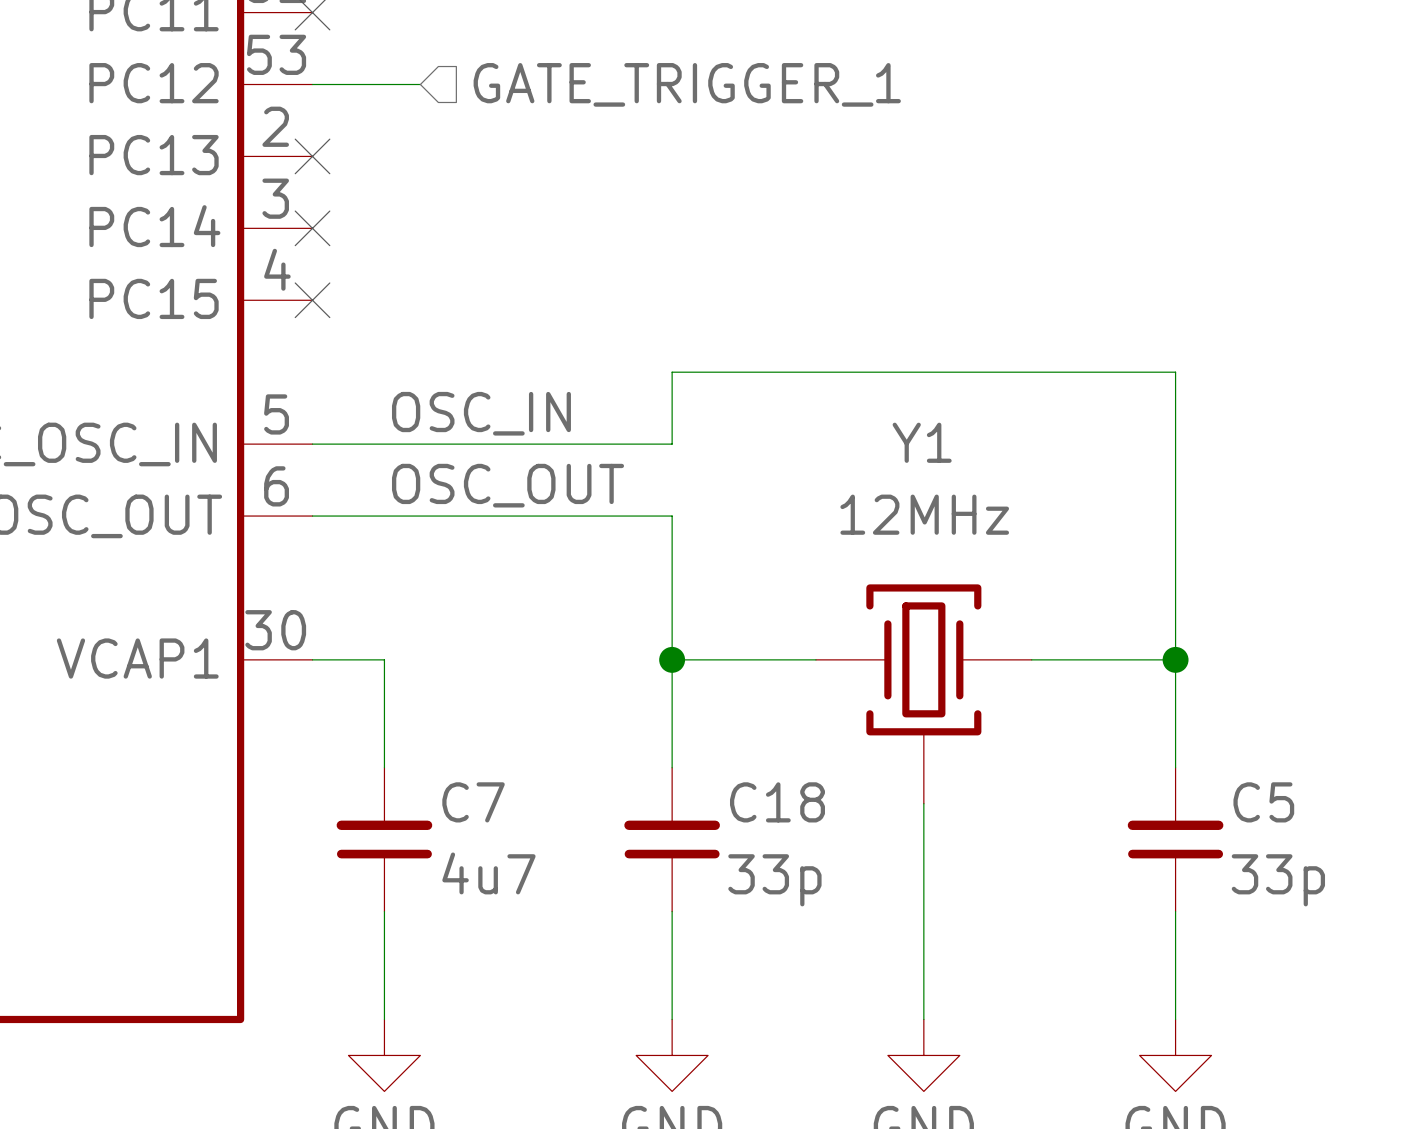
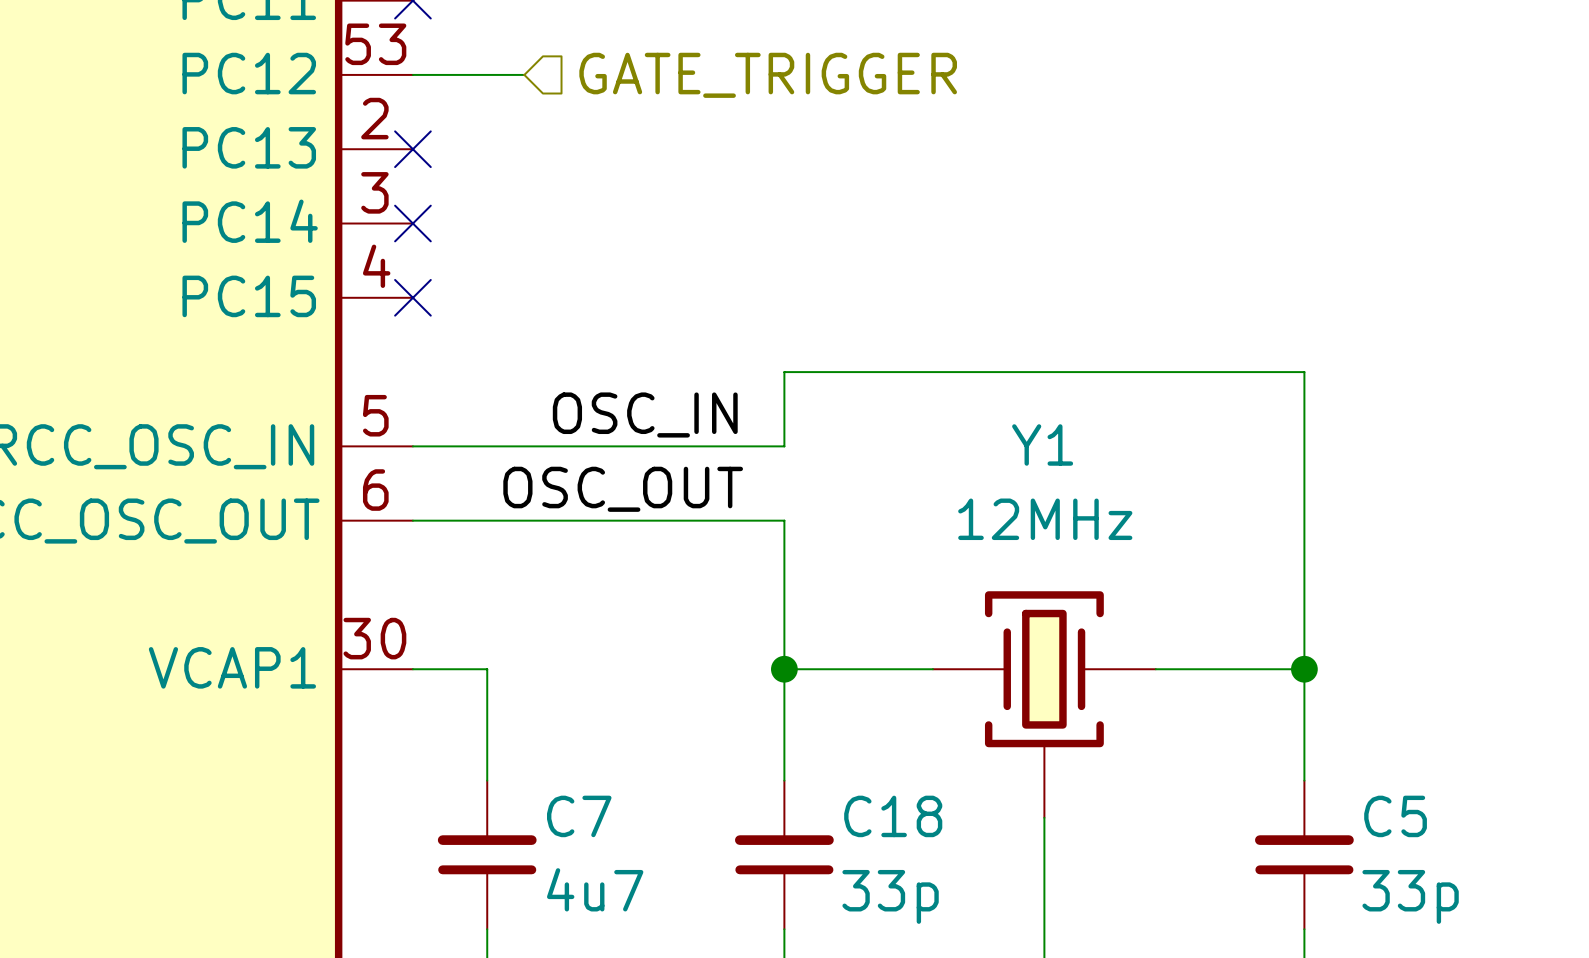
hierarchical label: GATE_TRIGGER_1 (687, 84) -> GATE_TRIGGER (768, 75)
label position: OSC_IN (481, 413) -> OSC_IN (645, 415)
label position: OSC_OUT (508, 485) -> OSC_OUT (623, 489)

